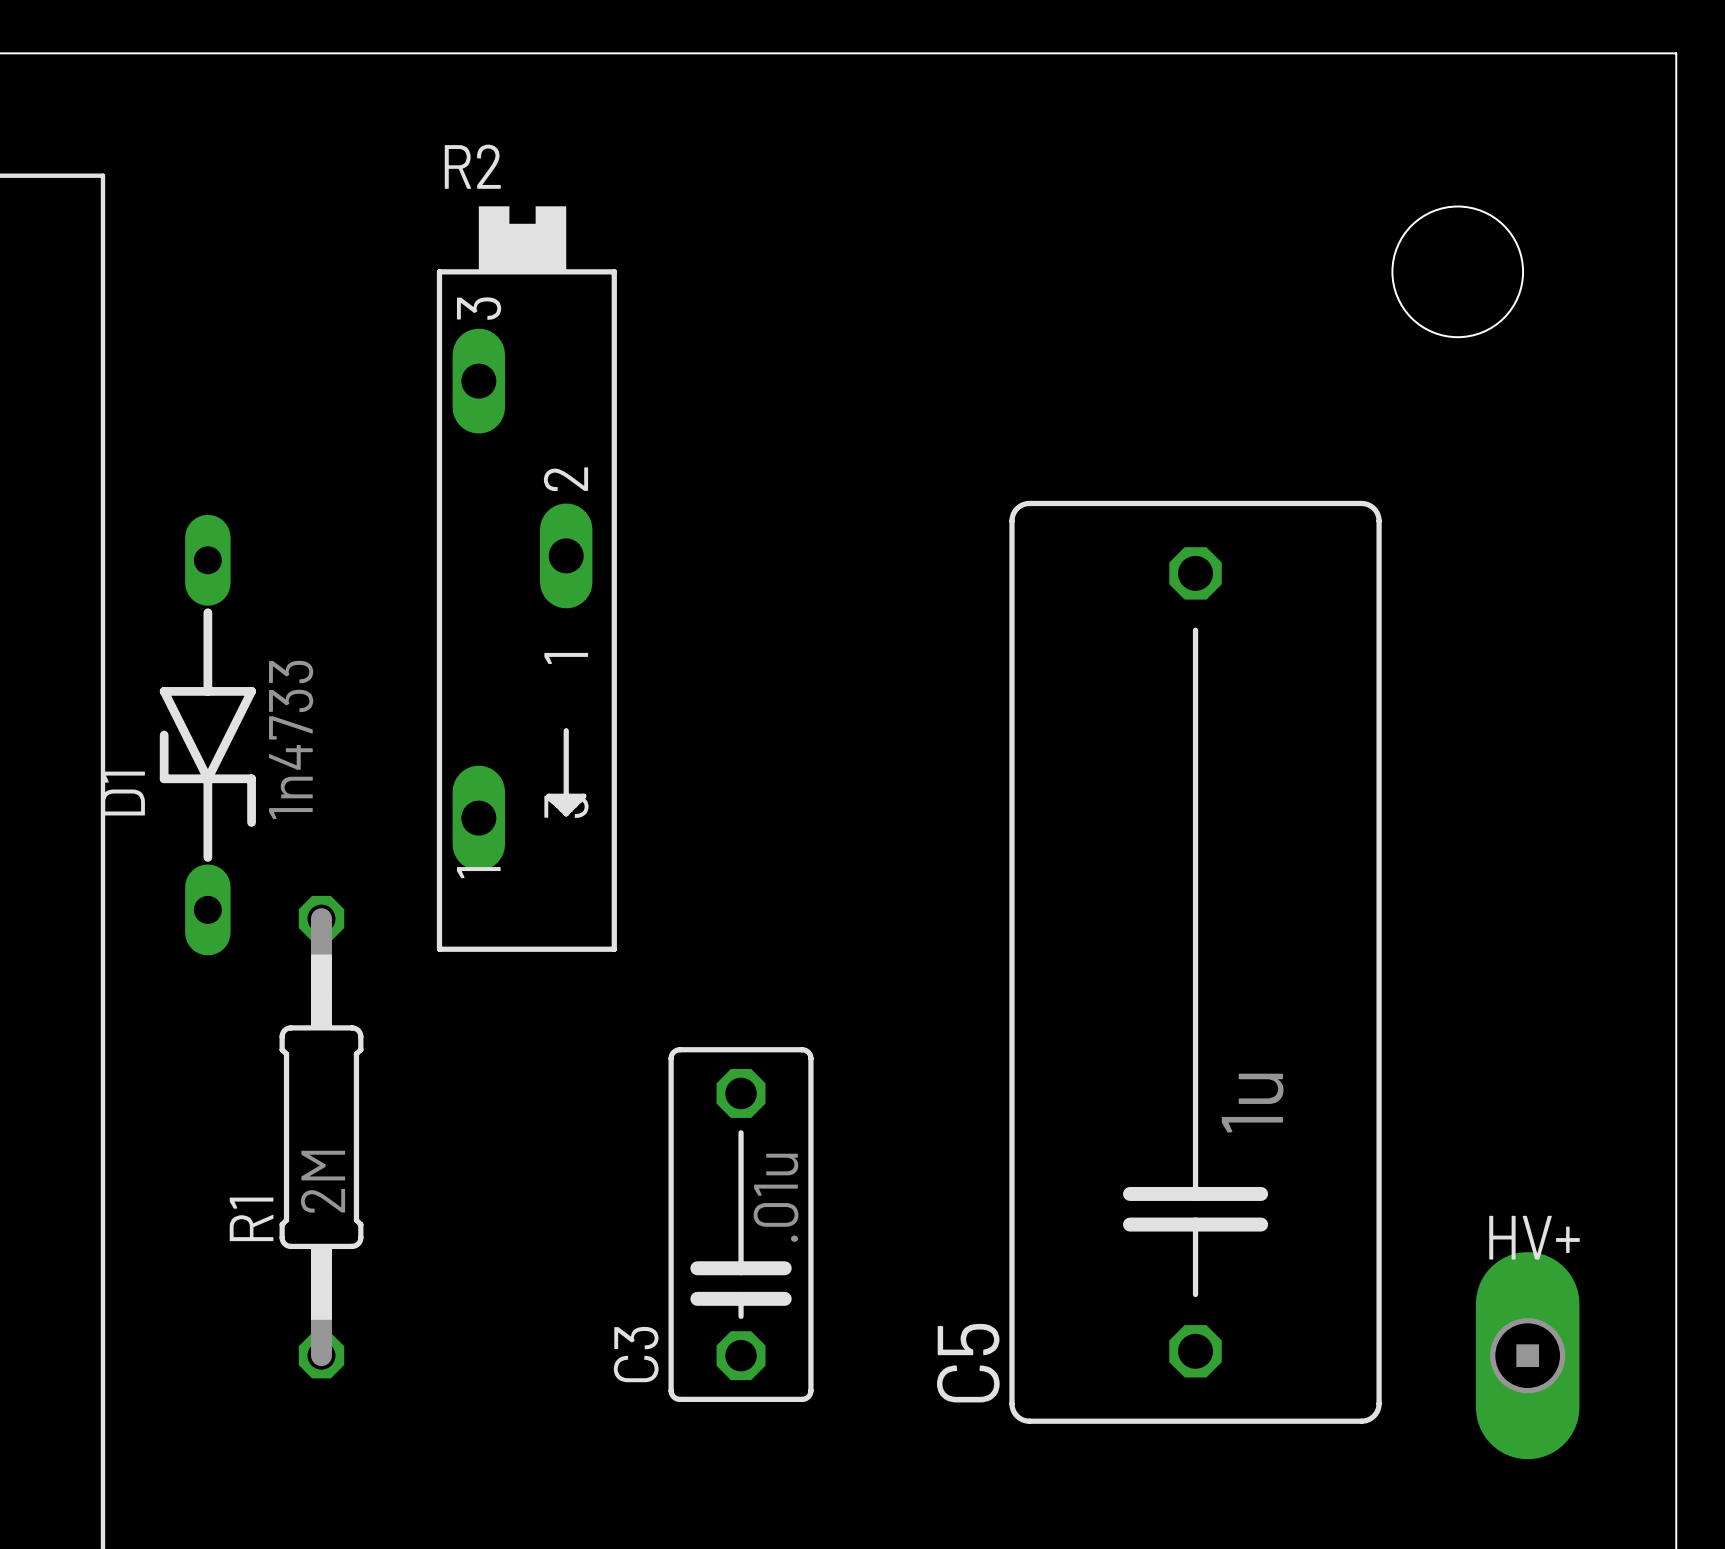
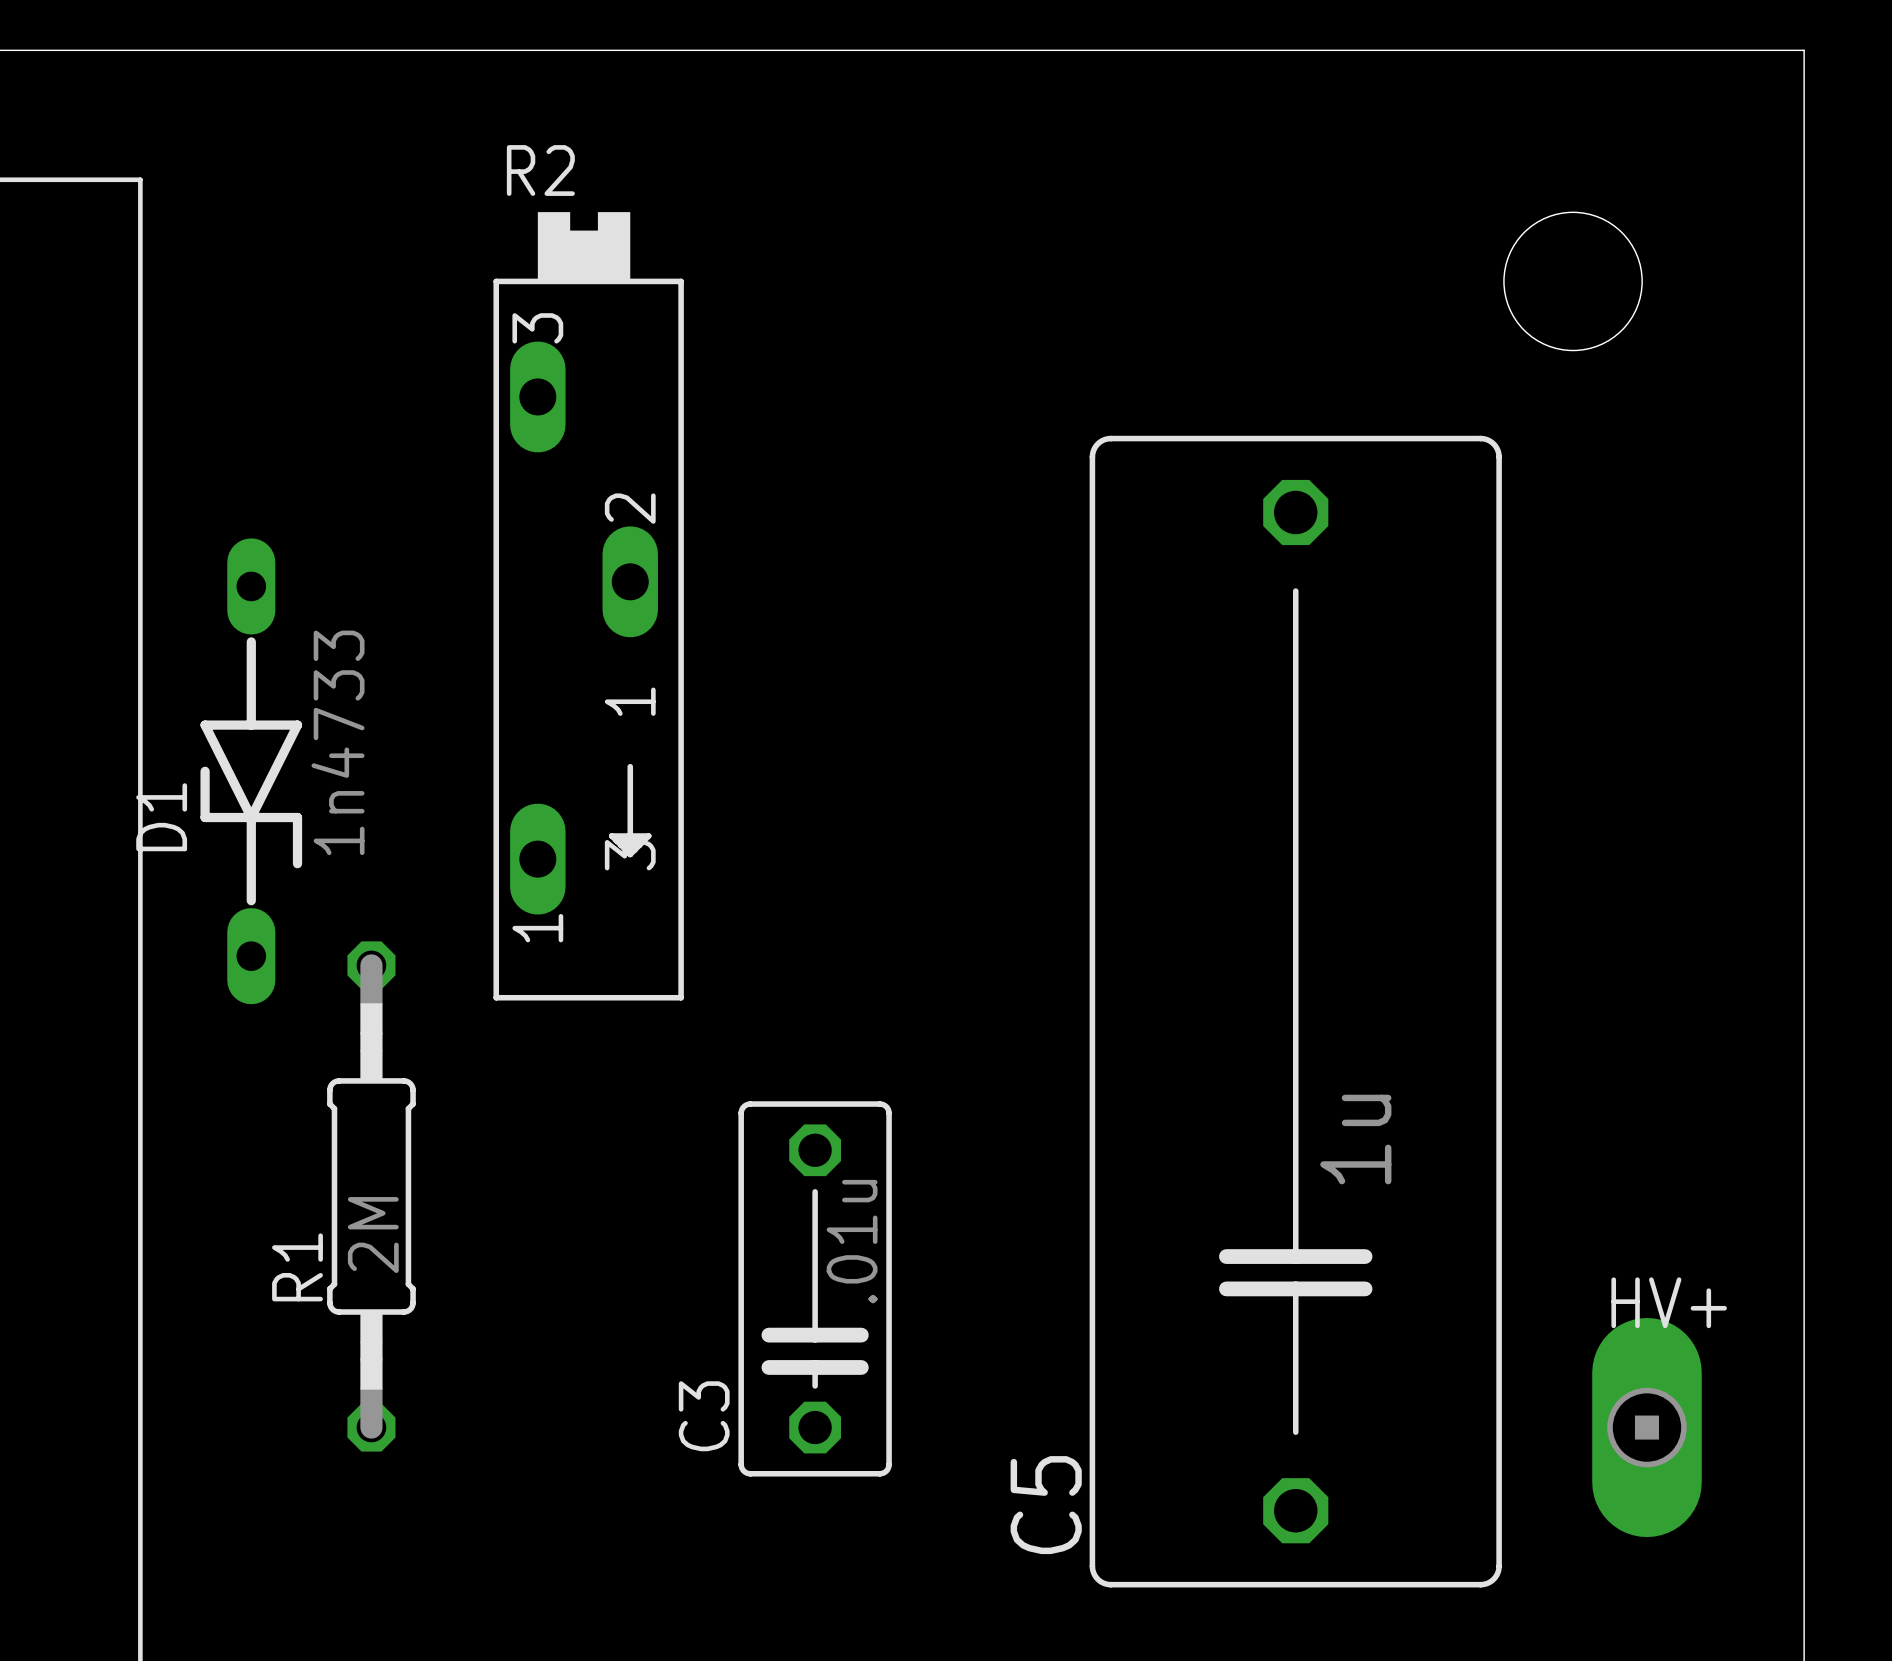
C5 footprint: [1009, 500, 1382, 1424] -> [1089, 435, 1502, 1588]
C5 name position: C5 (968, 1363) -> C5 (1046, 1505)

